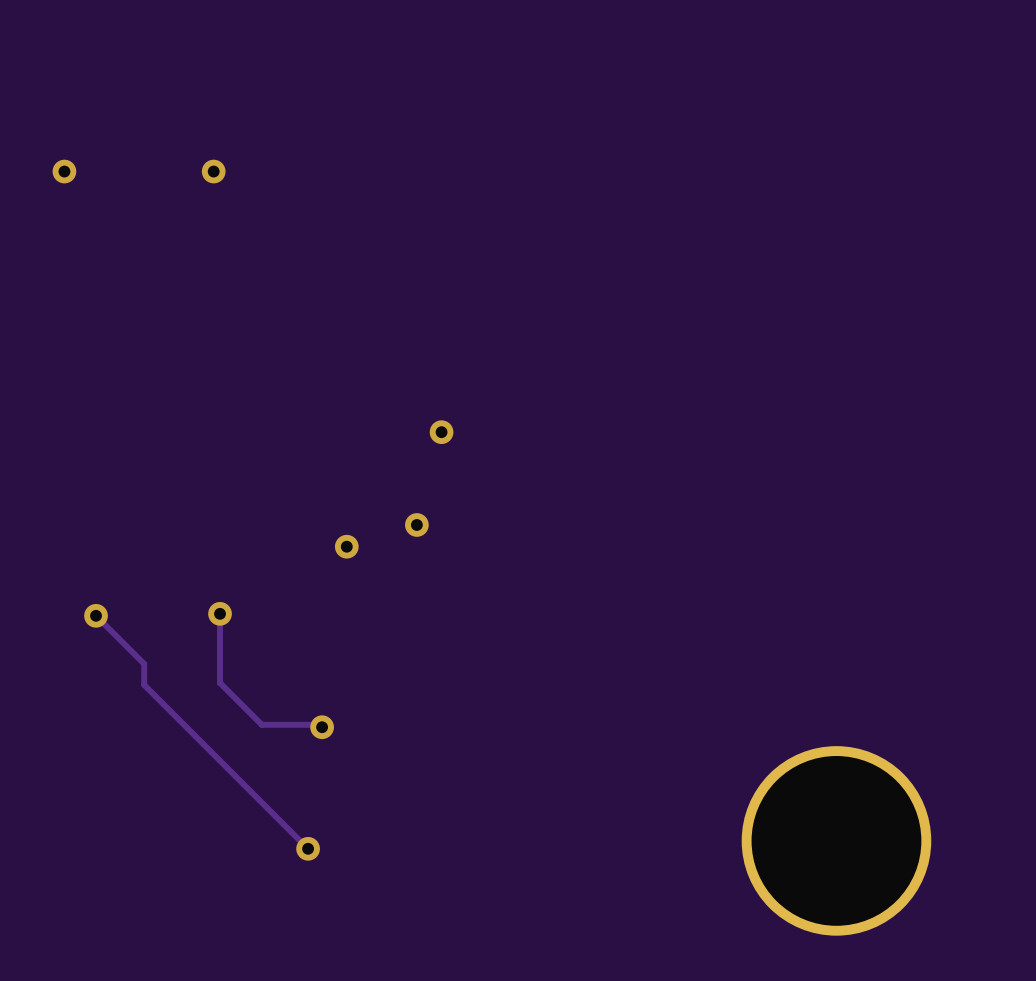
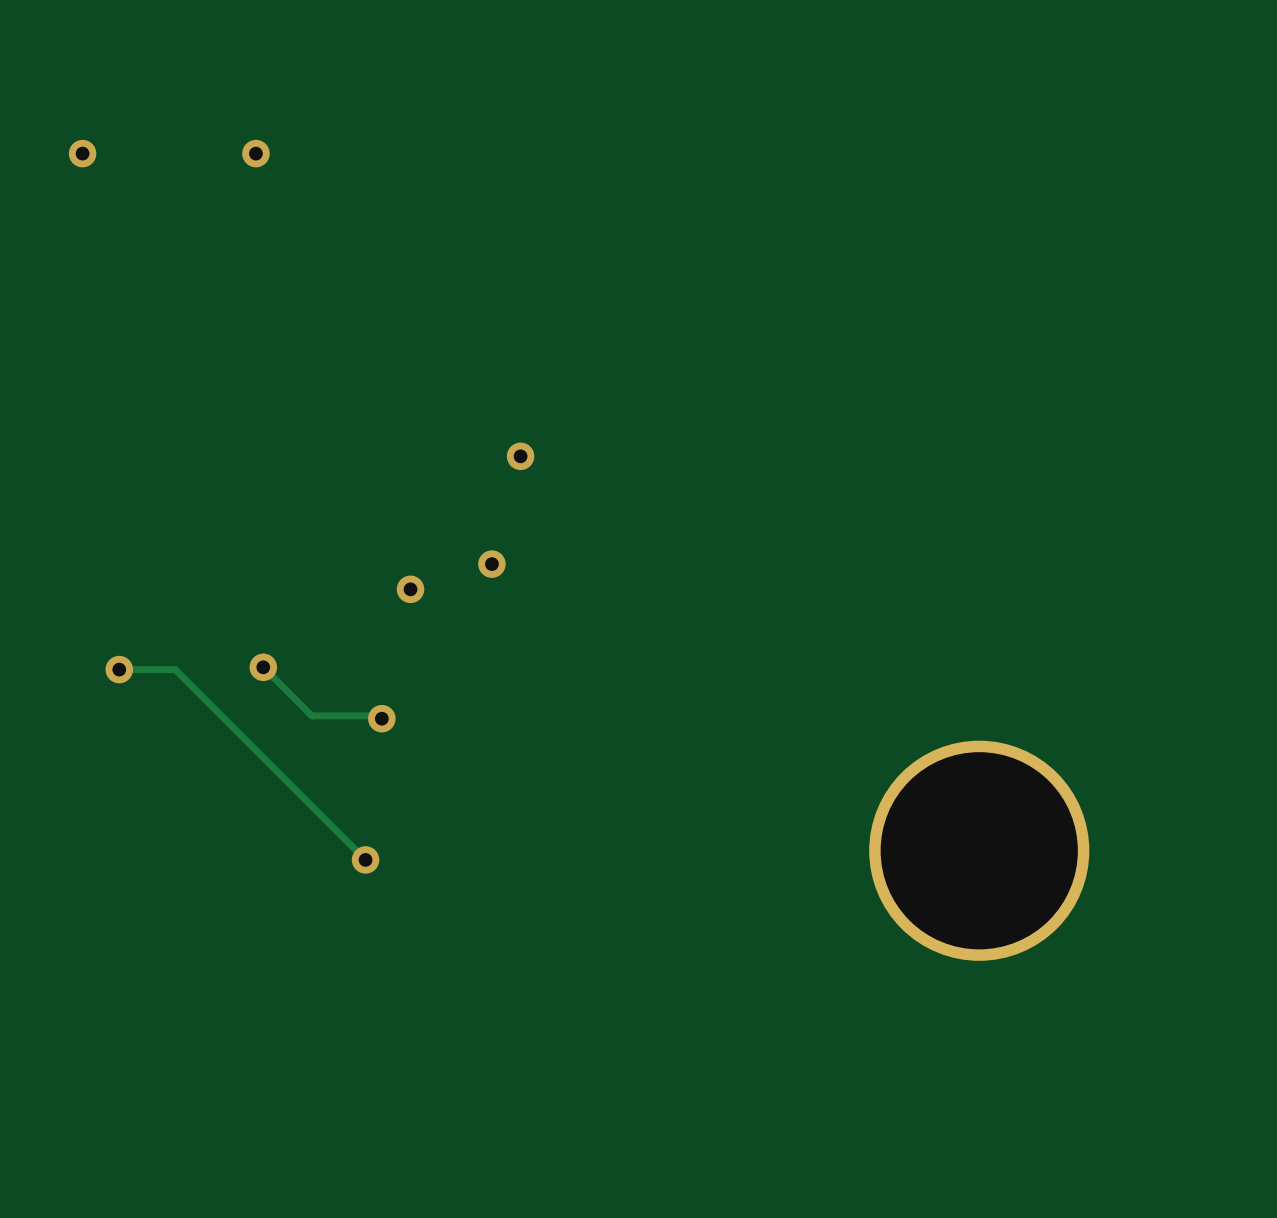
track: (220, 613) (220, 682) (261, 724) (320, 724) (322, 727) -> (263, 667) (311, 715) (380, 715) (381, 718)
track: (96, 615) (144, 663) (144, 684) (308, 848) -> (119, 669) (175, 669) (365, 859)
via: none -> (381, 718)
via: (322, 727) -> none
via: none -> (365, 859)
part position: (836, 840) -> (979, 850)
via: (308, 848) -> none

